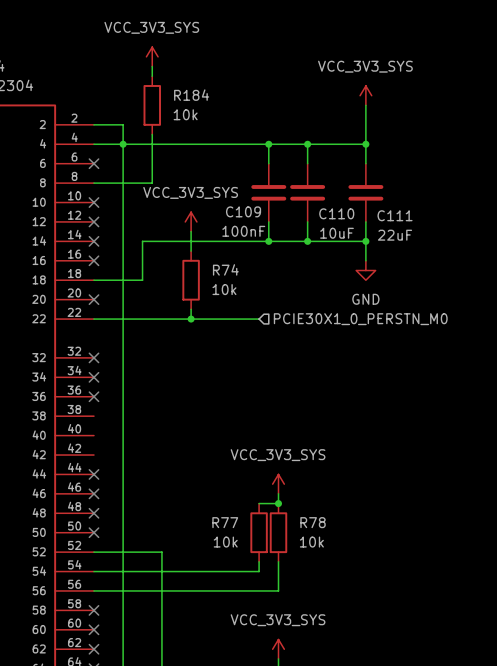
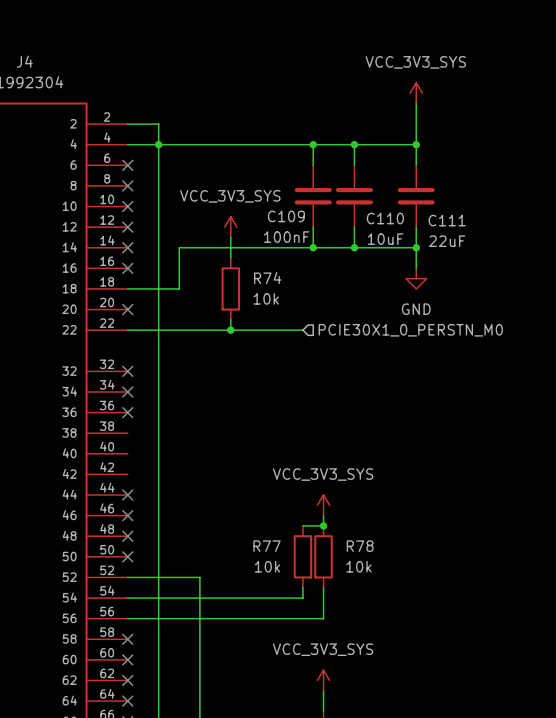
power symbol: VCC_3V3_SYS (152, 56) -> none
wire: (152, 66) (152, 76) -> none
R184: 10k (152, 105) -> none
wire: (152, 134) (152, 183) (93, 183) -> none
no-connect mark: none -> (127, 185)

